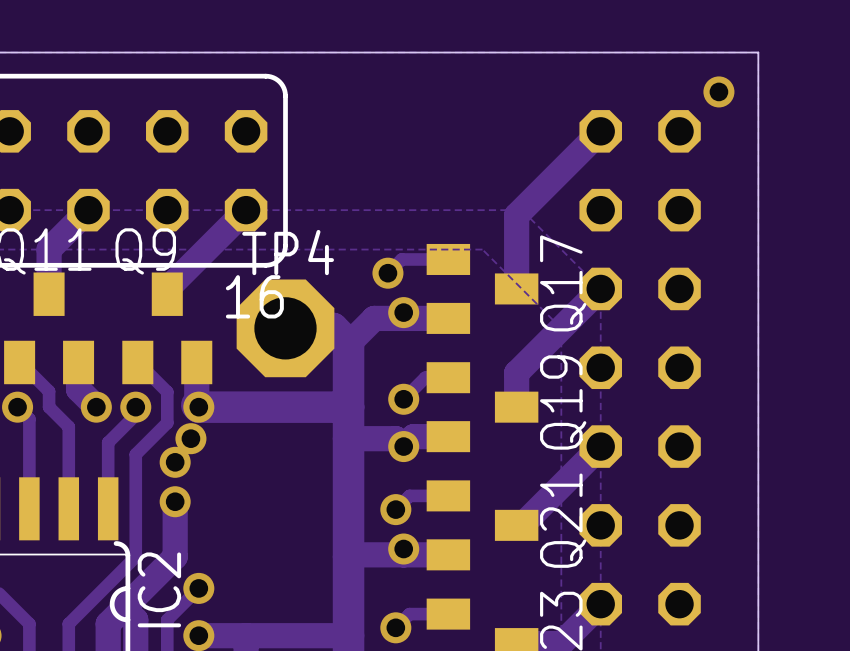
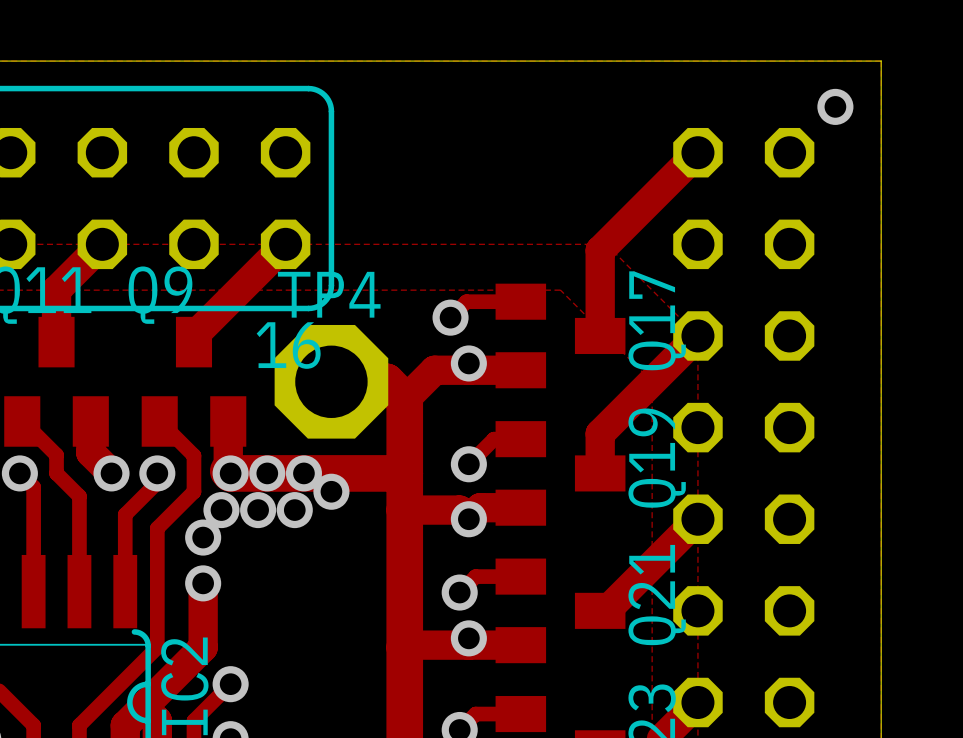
via: none -> (267, 473)
via: none -> (303, 473)
via: none -> (331, 491)
via: none -> (258, 510)
via: none -> (294, 510)

